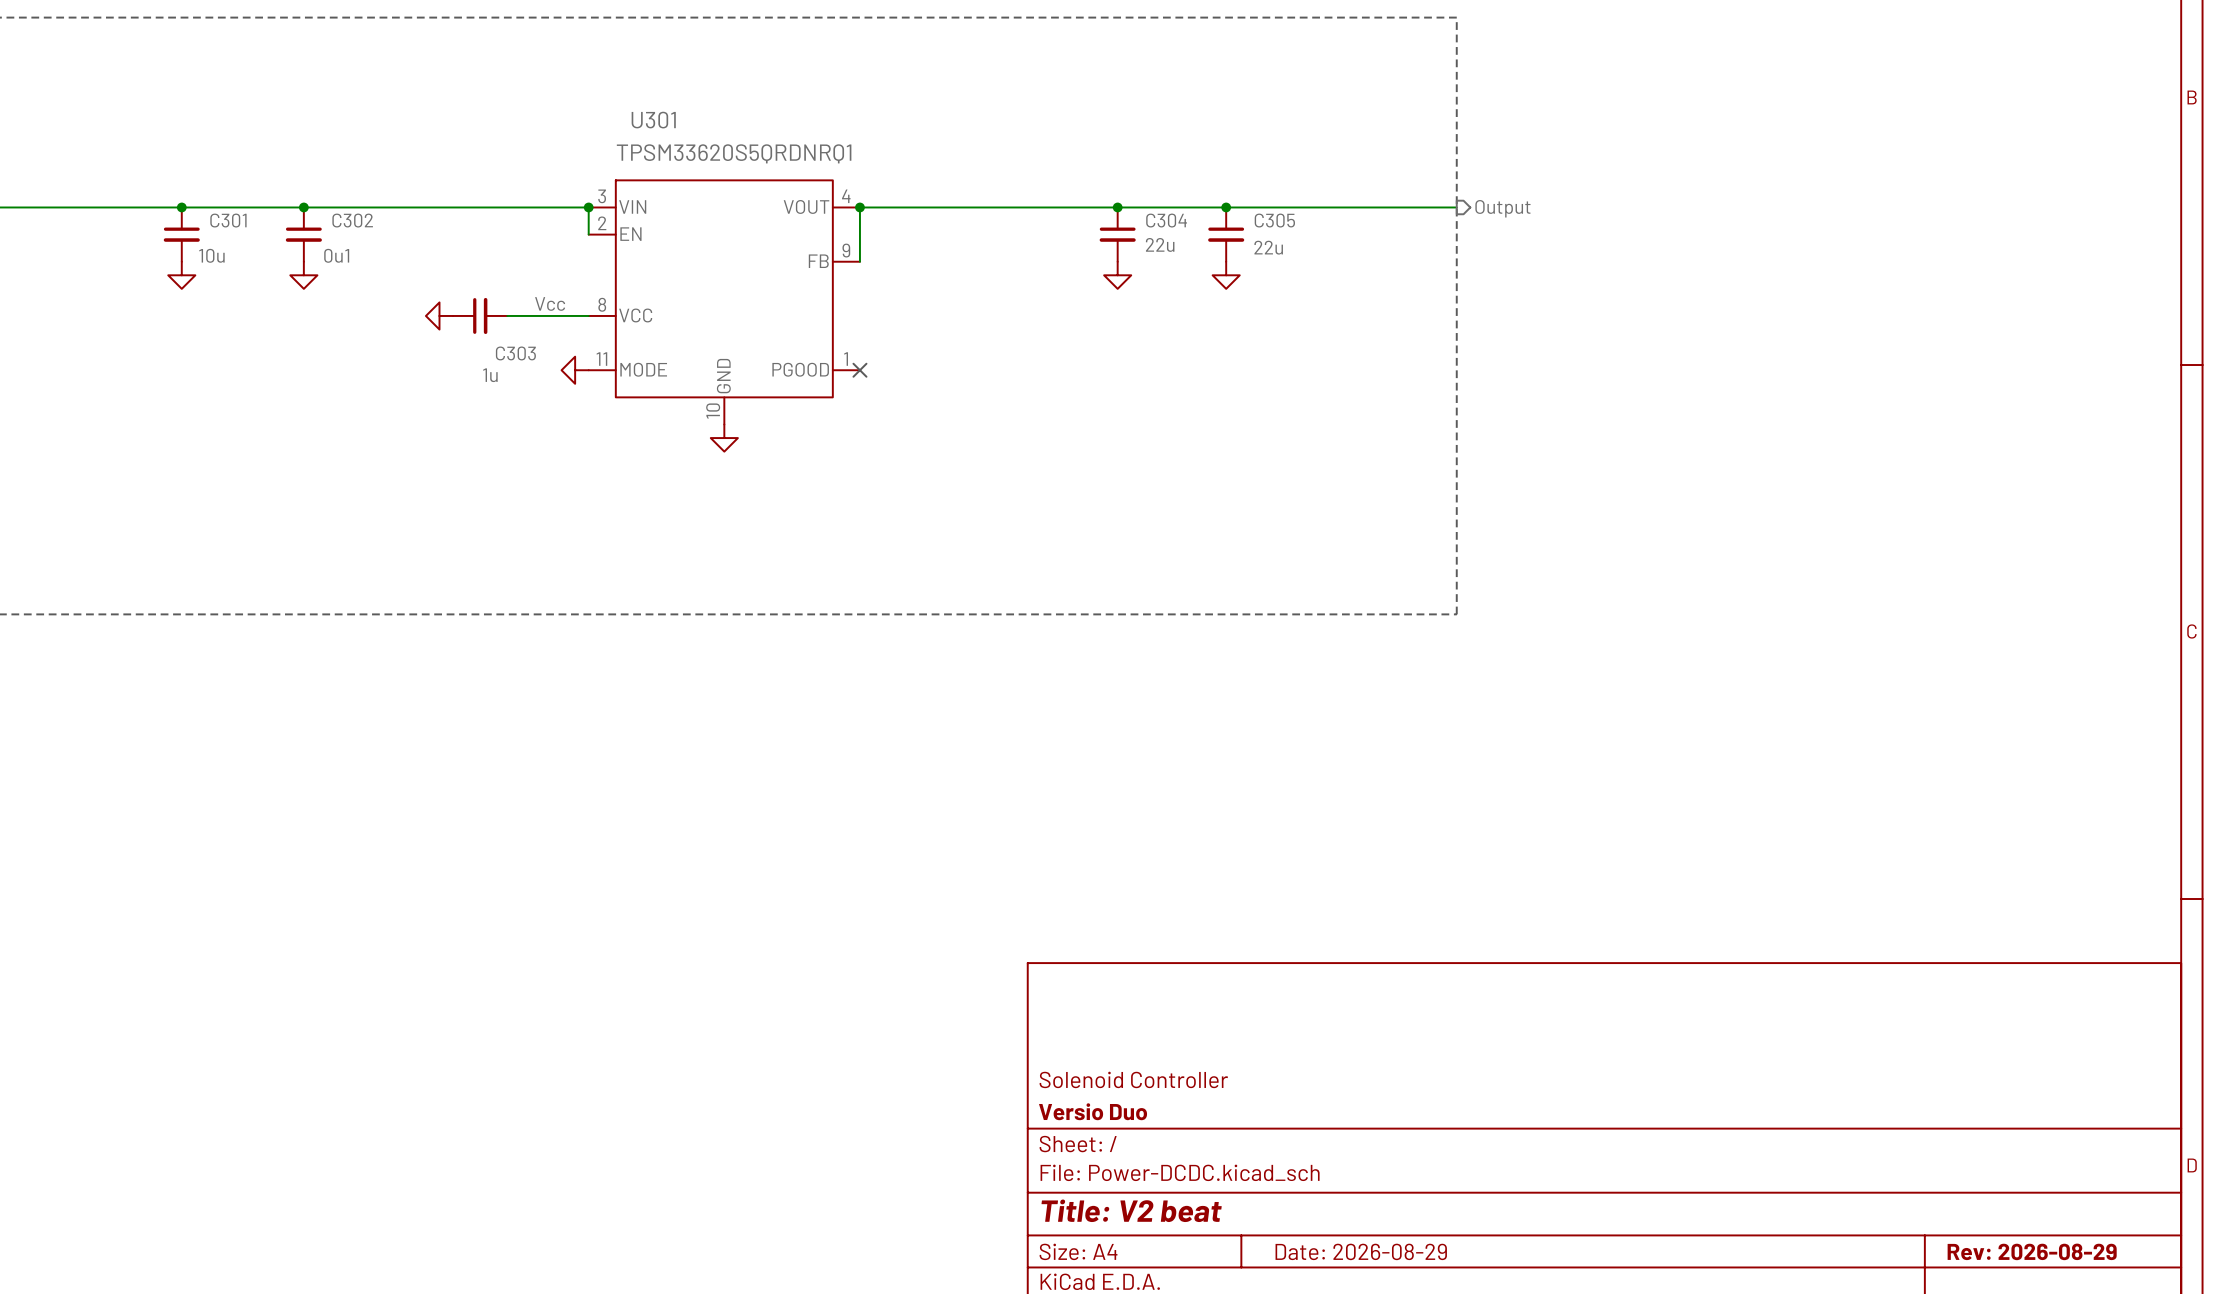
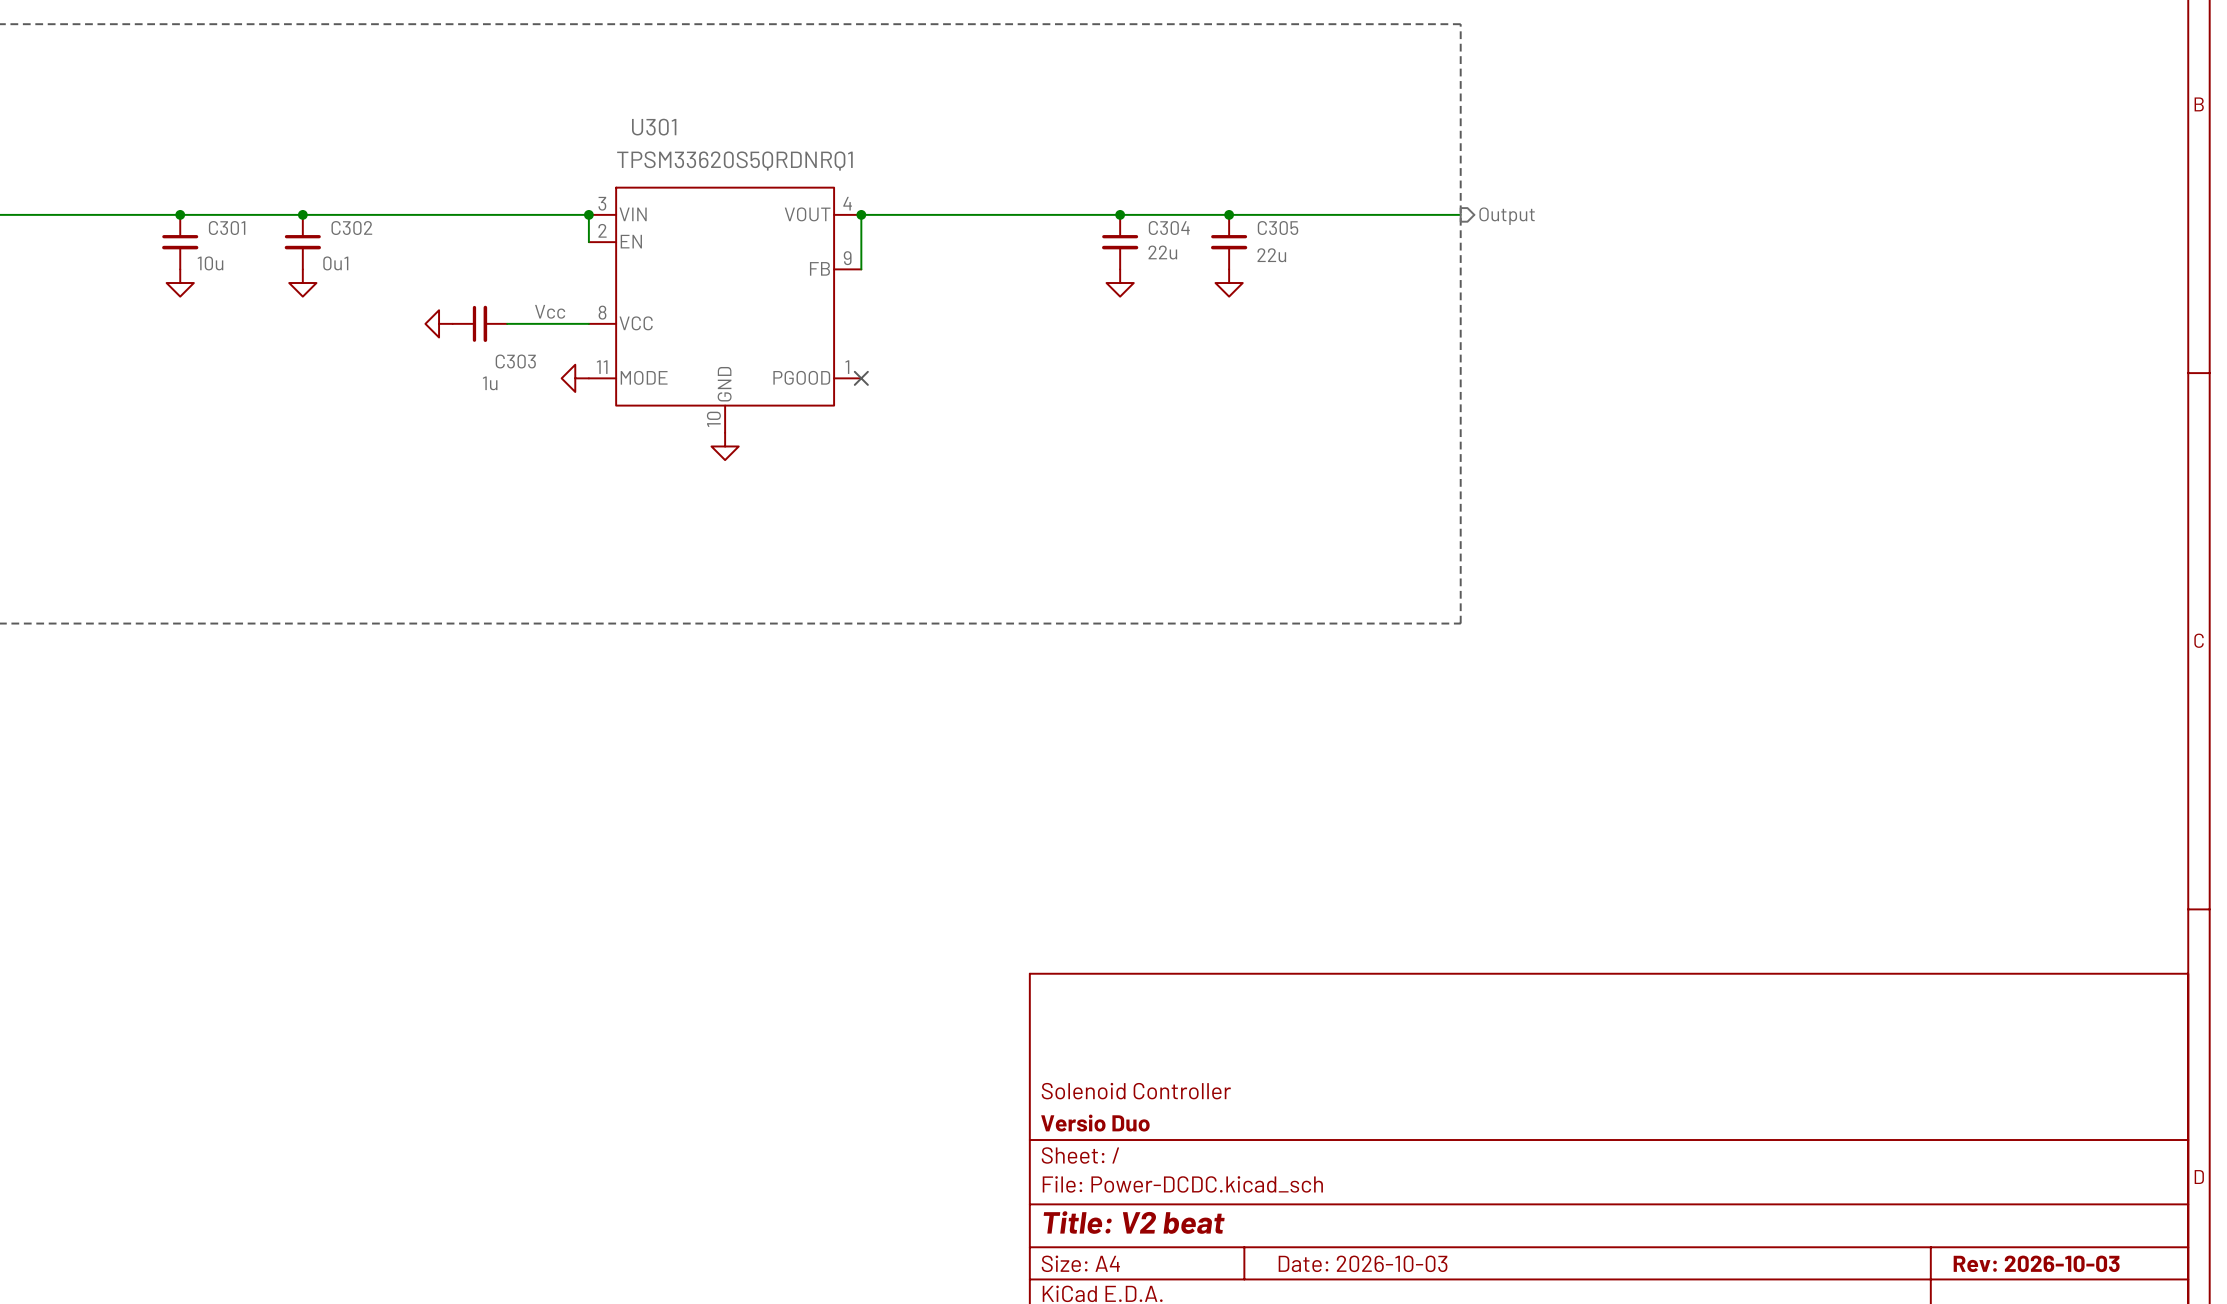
title block: Date: 2026-08-29 (1361, 1251) -> Date: 2026-10-03 (1363, 1263)
title block: Rev: 2026-08-29 (2032, 1251) -> Rev: 2026-10-03 (2036, 1263)

